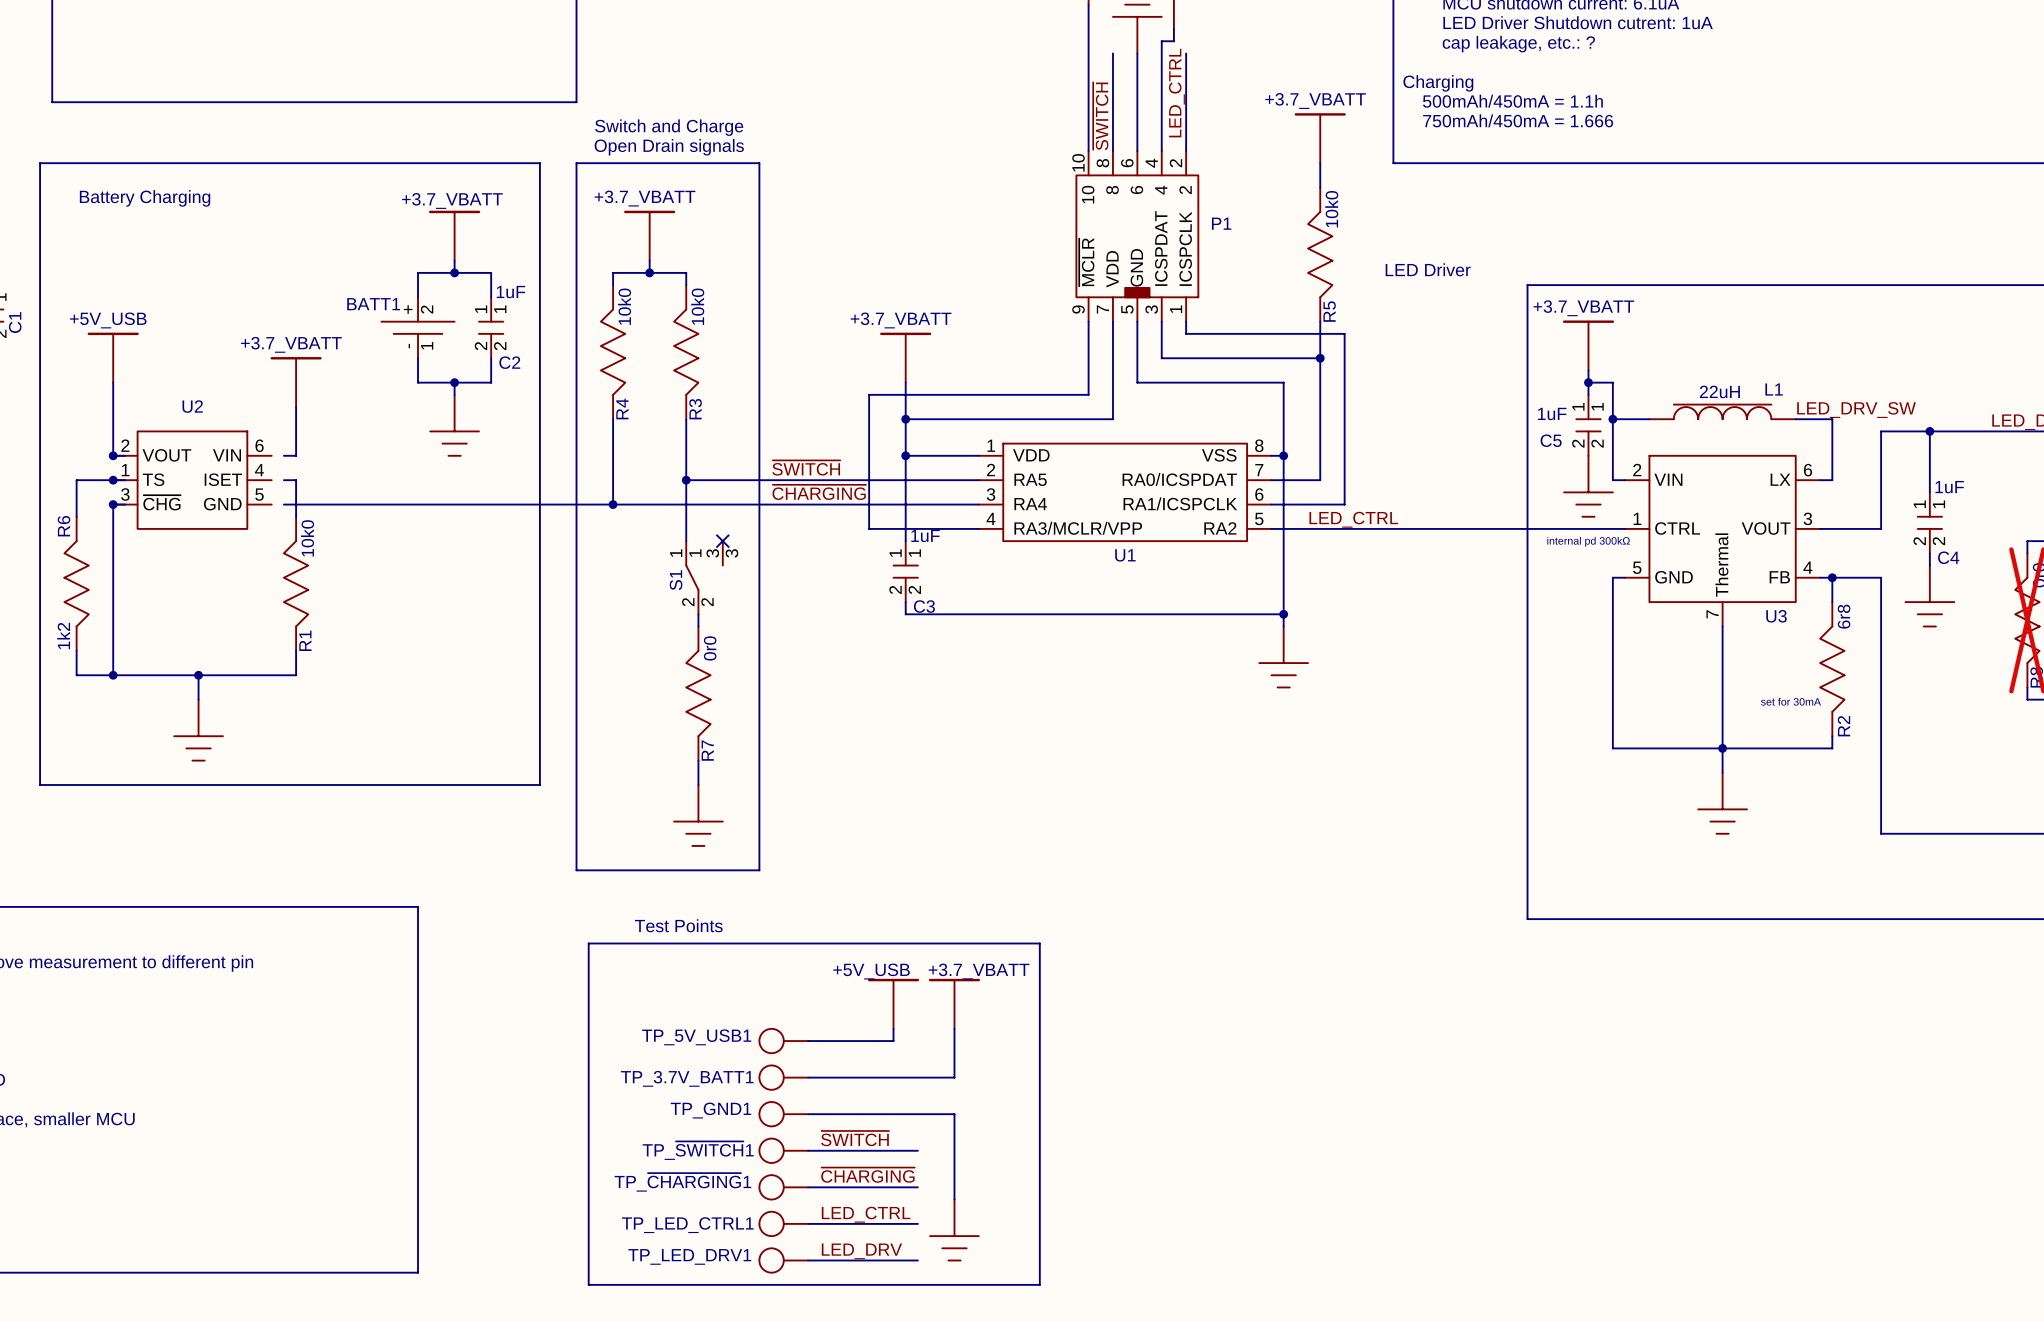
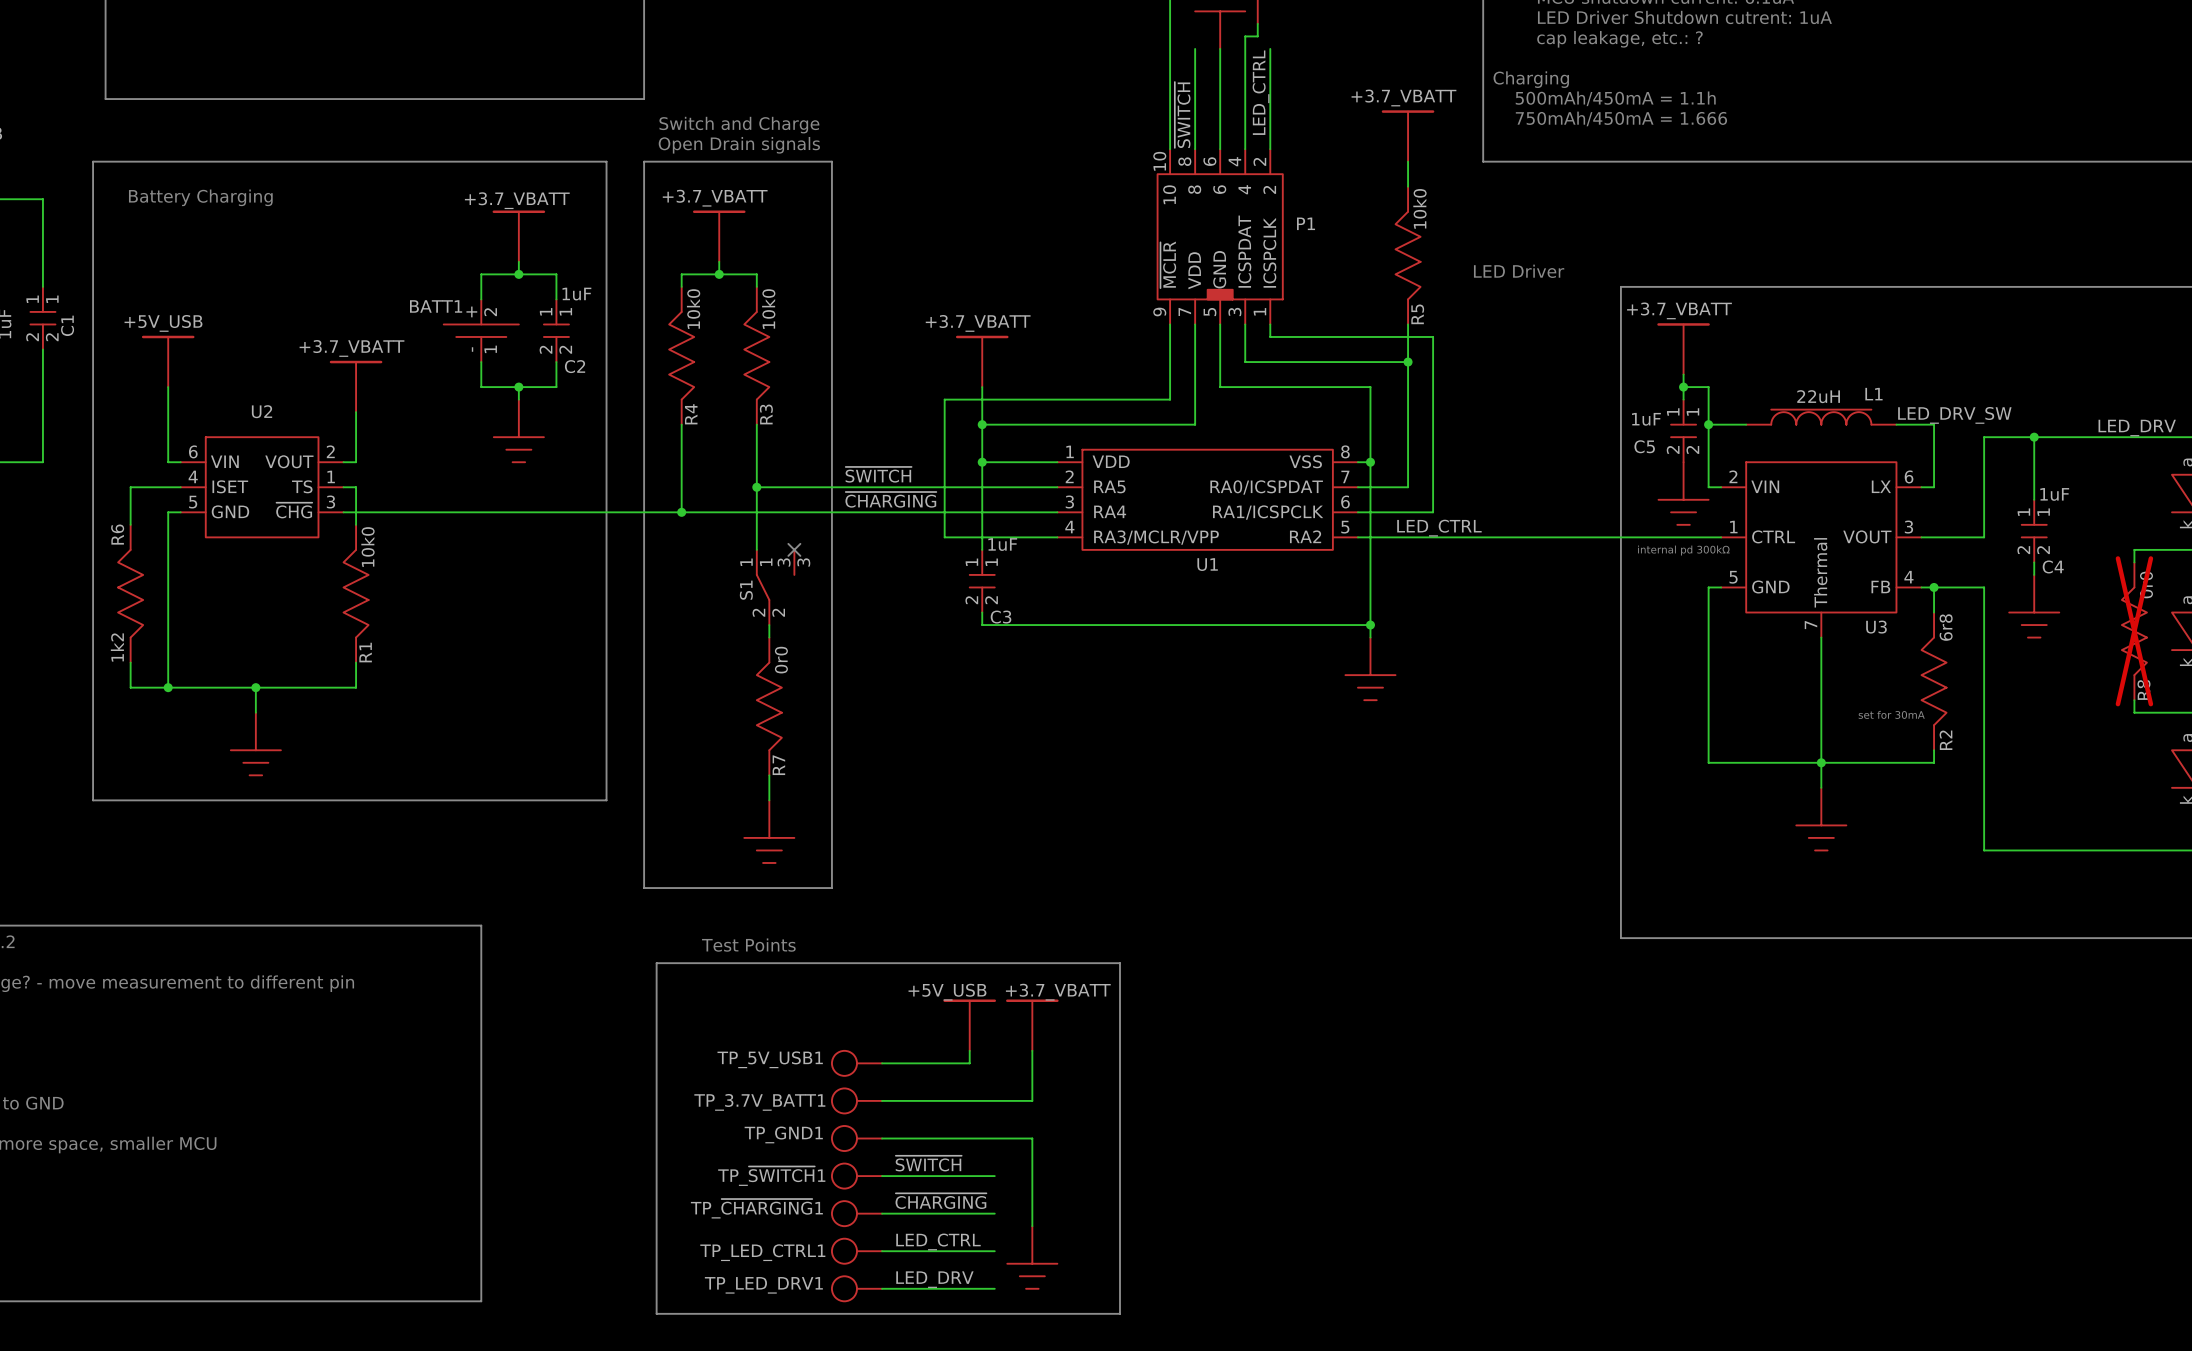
junction: (113, 455) -> none
junction: (113, 480) -> none
U2 flip: as is (192, 480) -> left-right (262, 487)
junction: (113, 504) -> none

